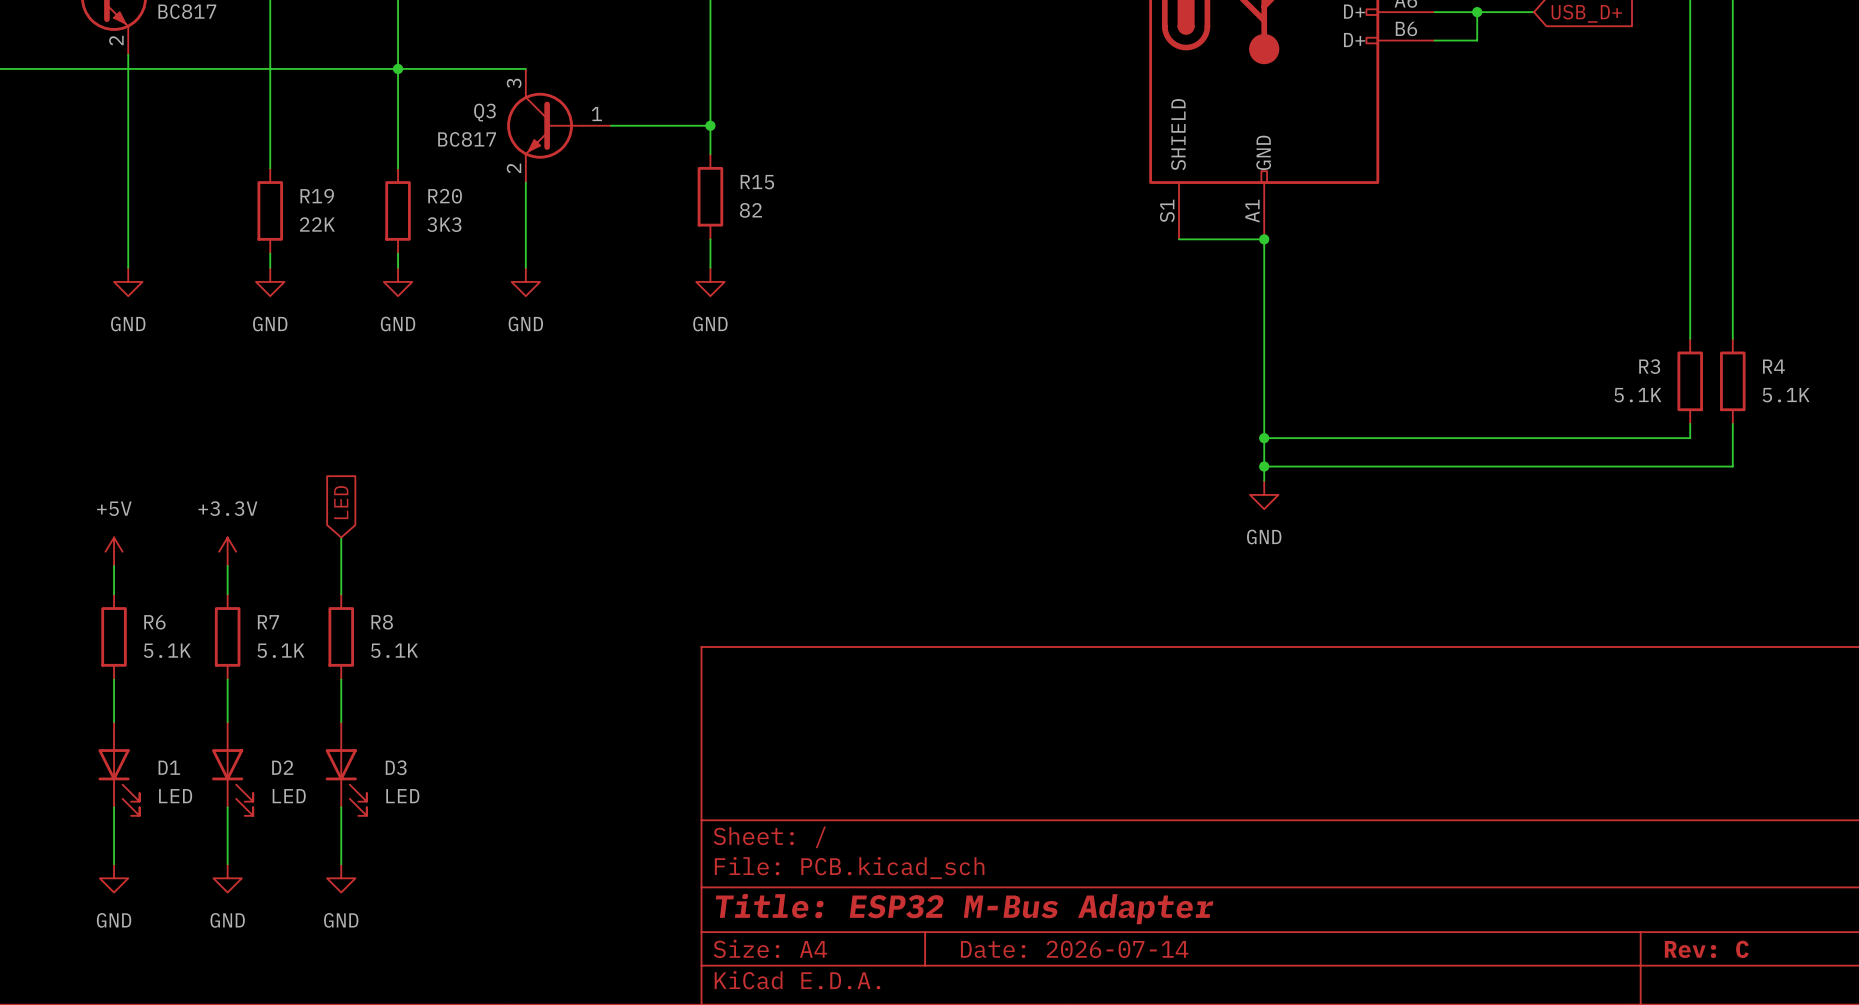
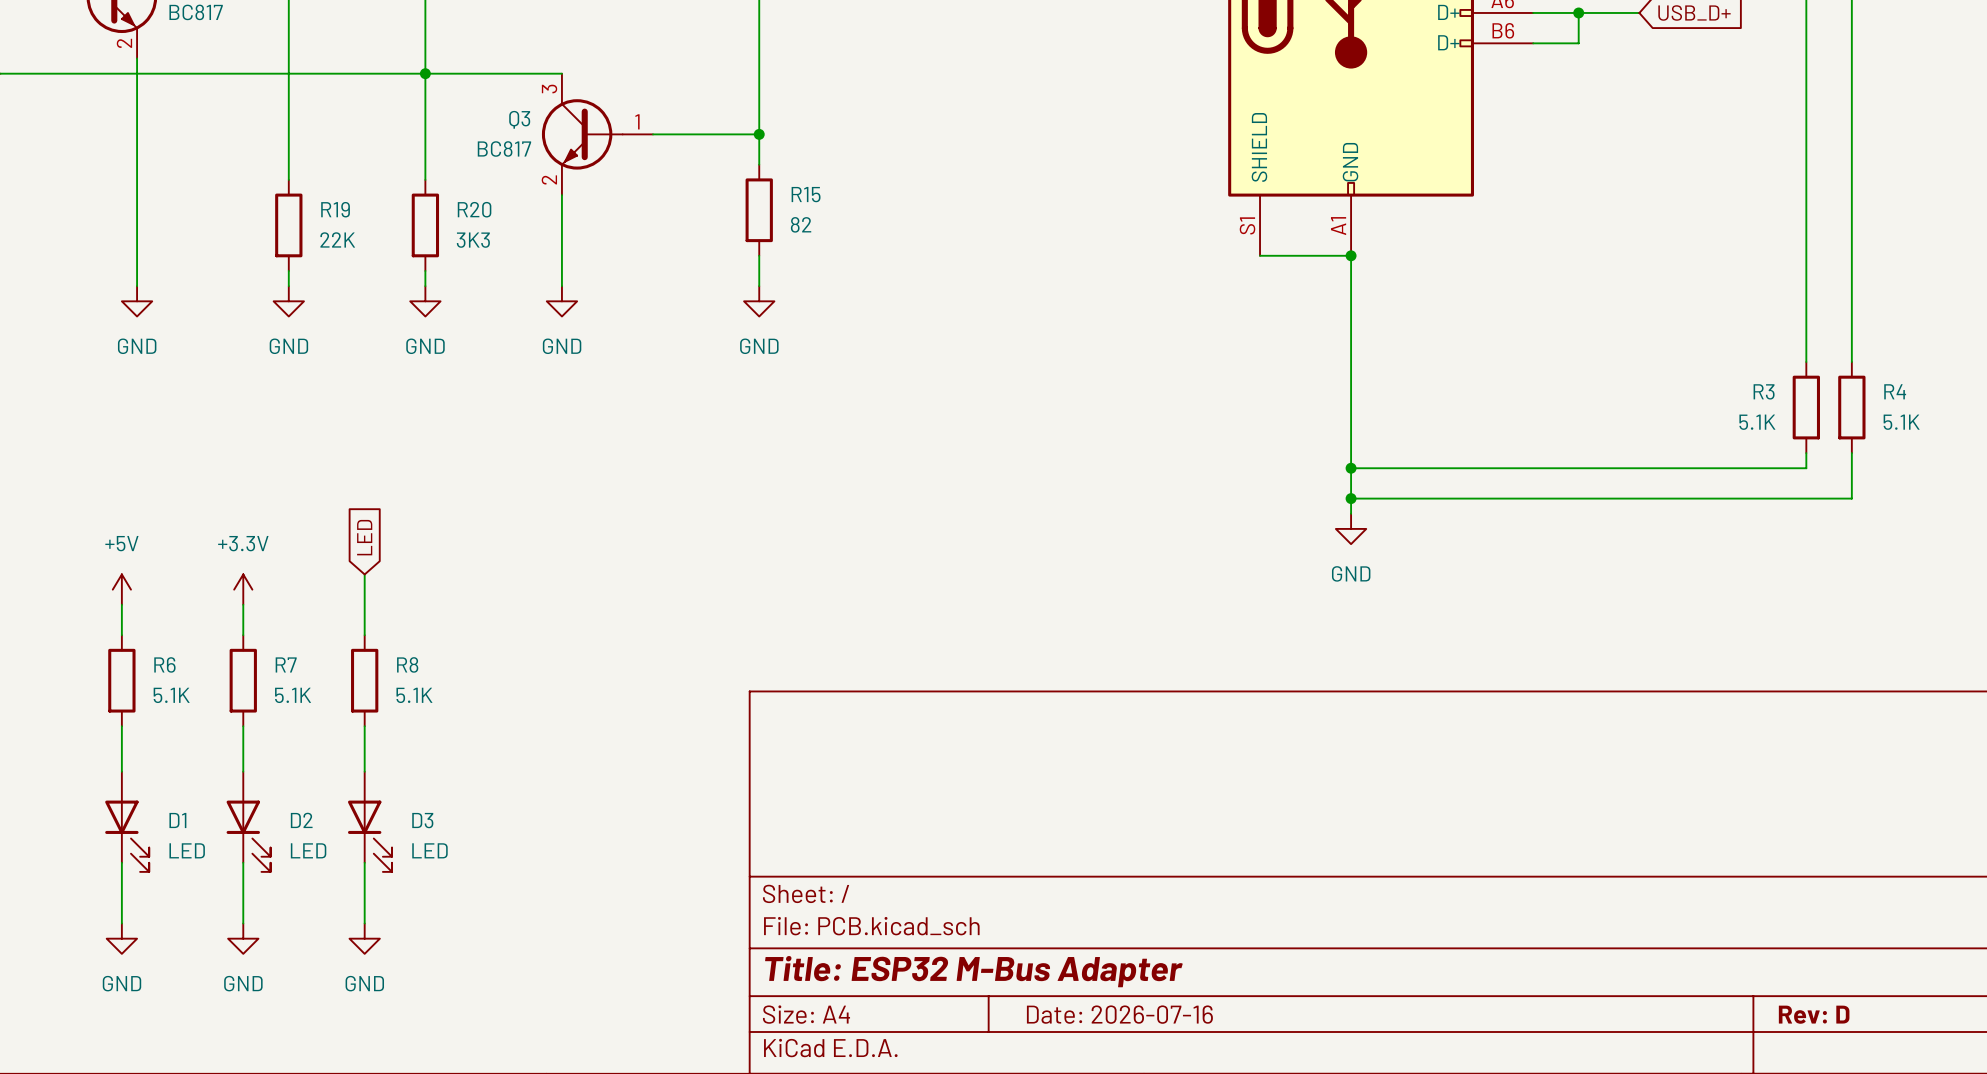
title block: Date: 2026-07-14 (1074, 949) -> Date: 2026-07-16 (1119, 1014)
title block: Rev: C (1706, 949) -> Rev: D (1814, 1014)

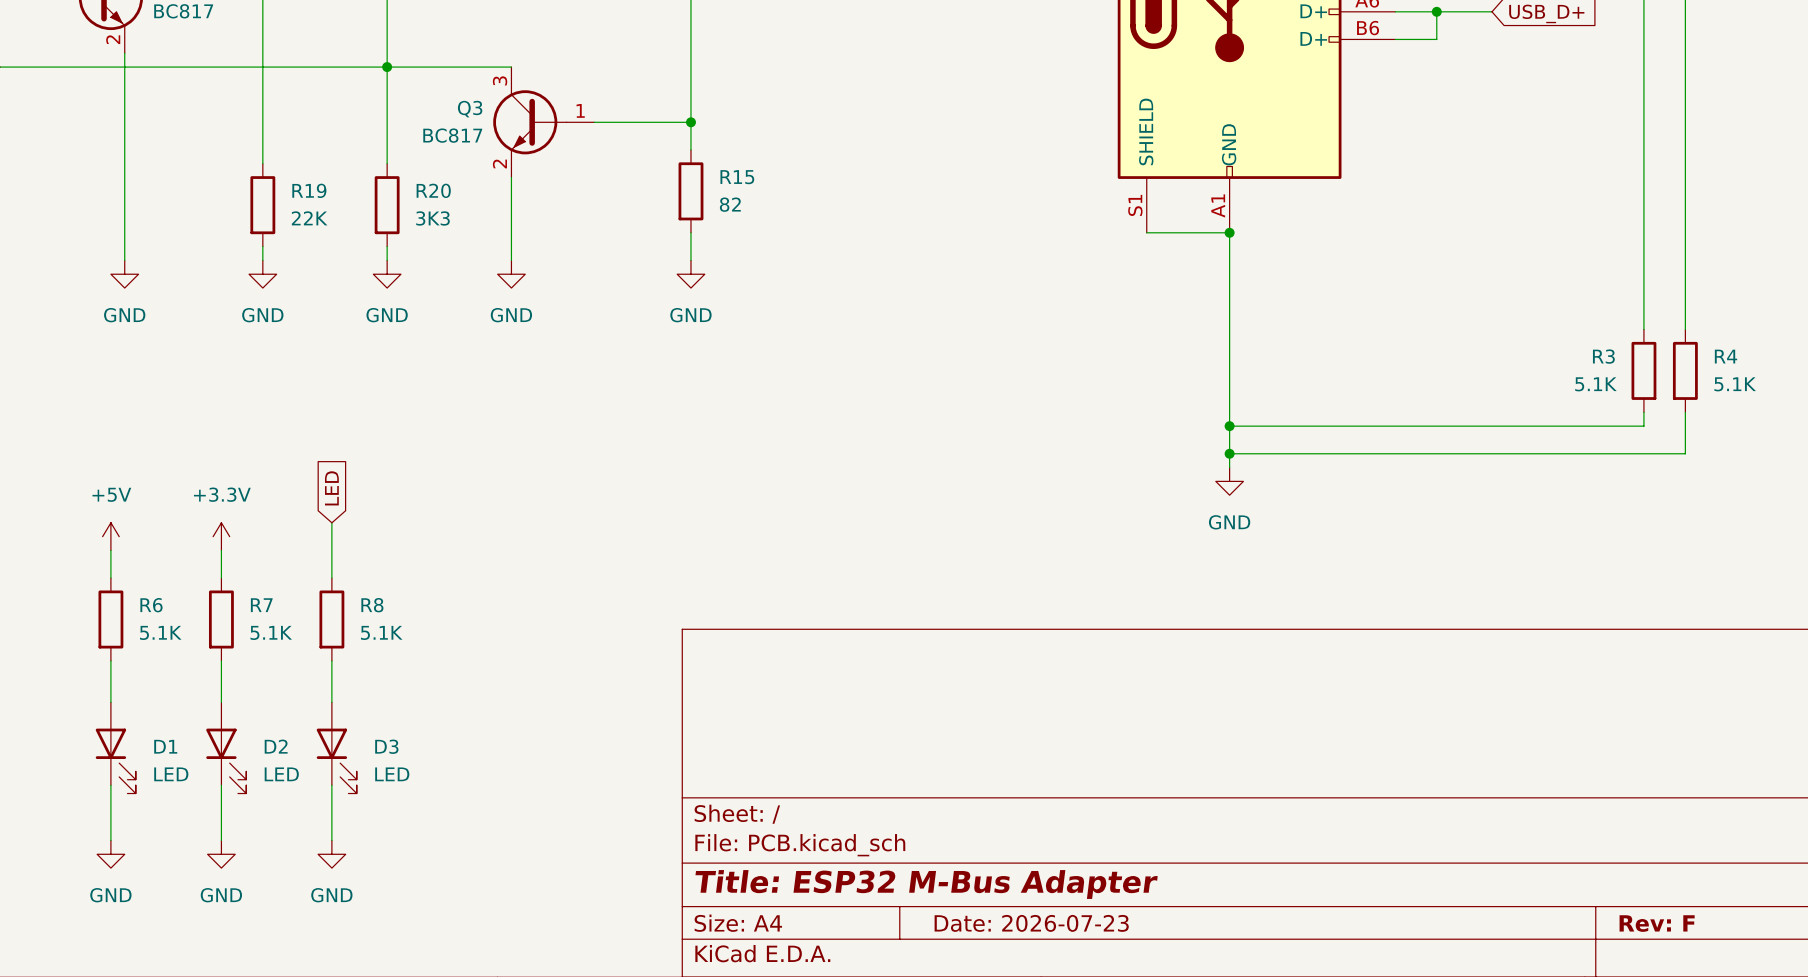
title block: Date: 2026-07-16 (1119, 1014) -> Date: 2026-07-23 (1031, 923)
title block: Rev: D (1814, 1014) -> Rev: F (1657, 923)

